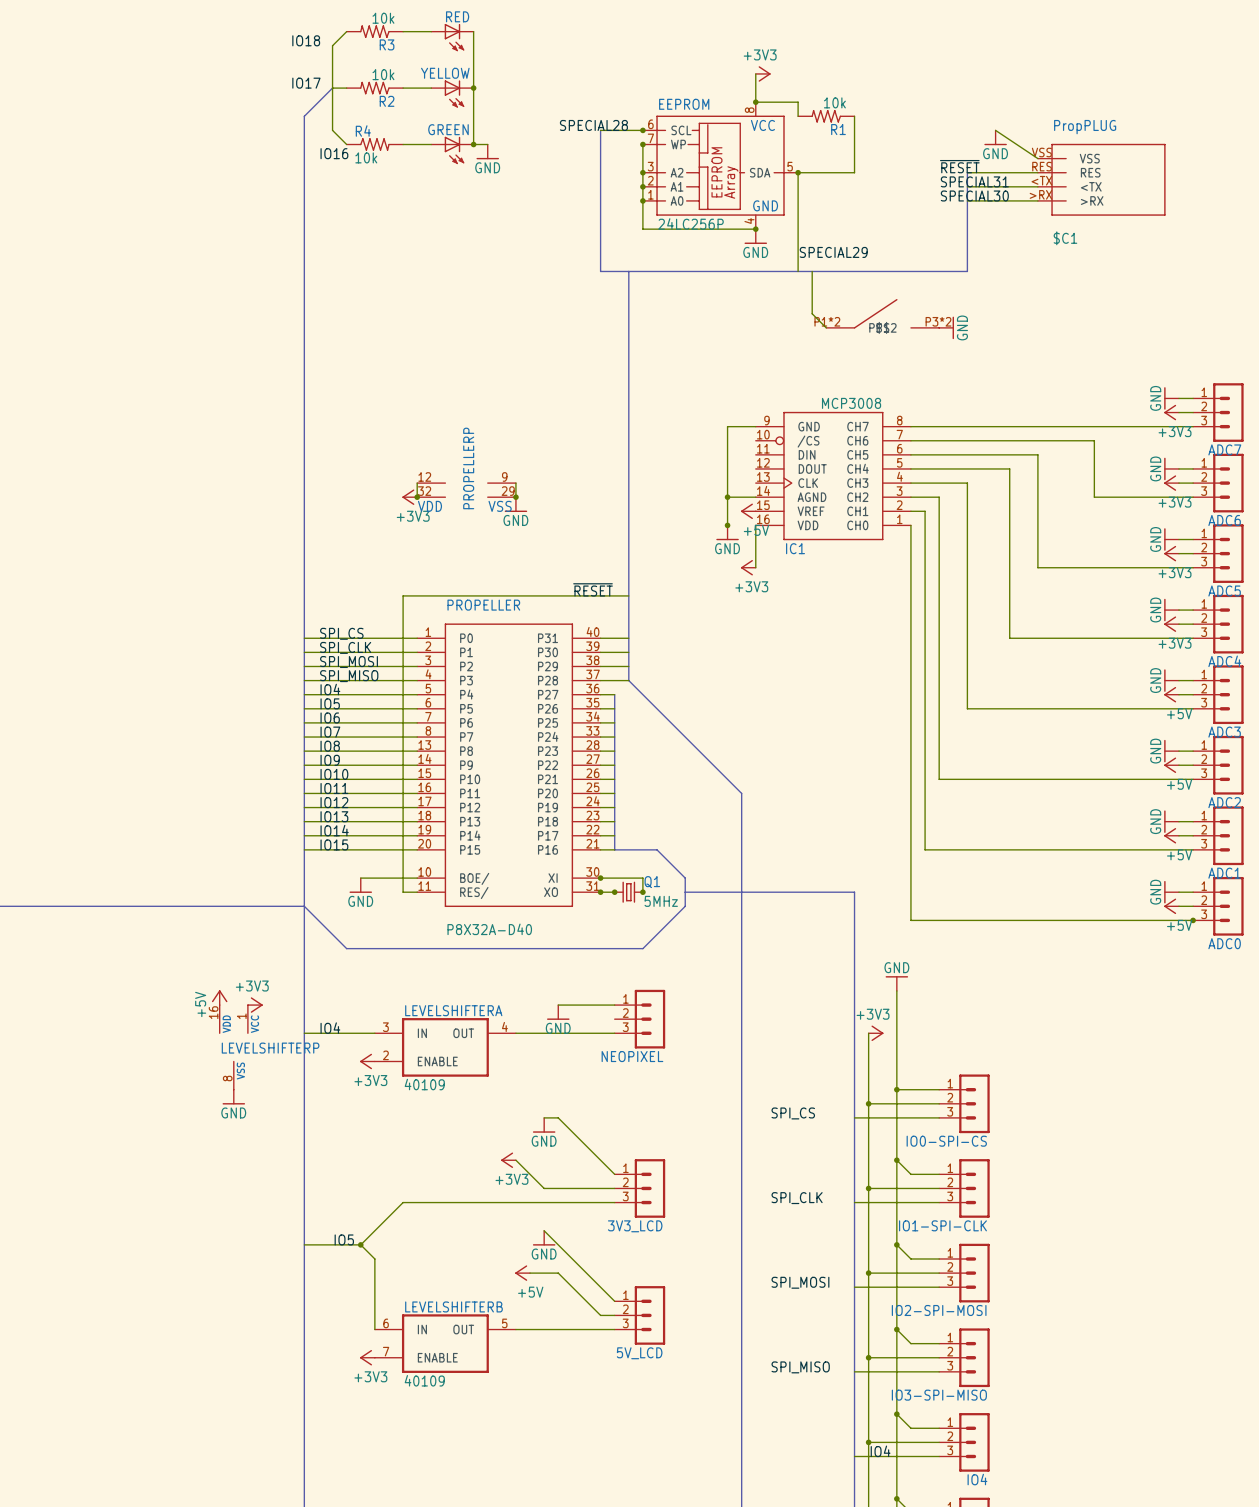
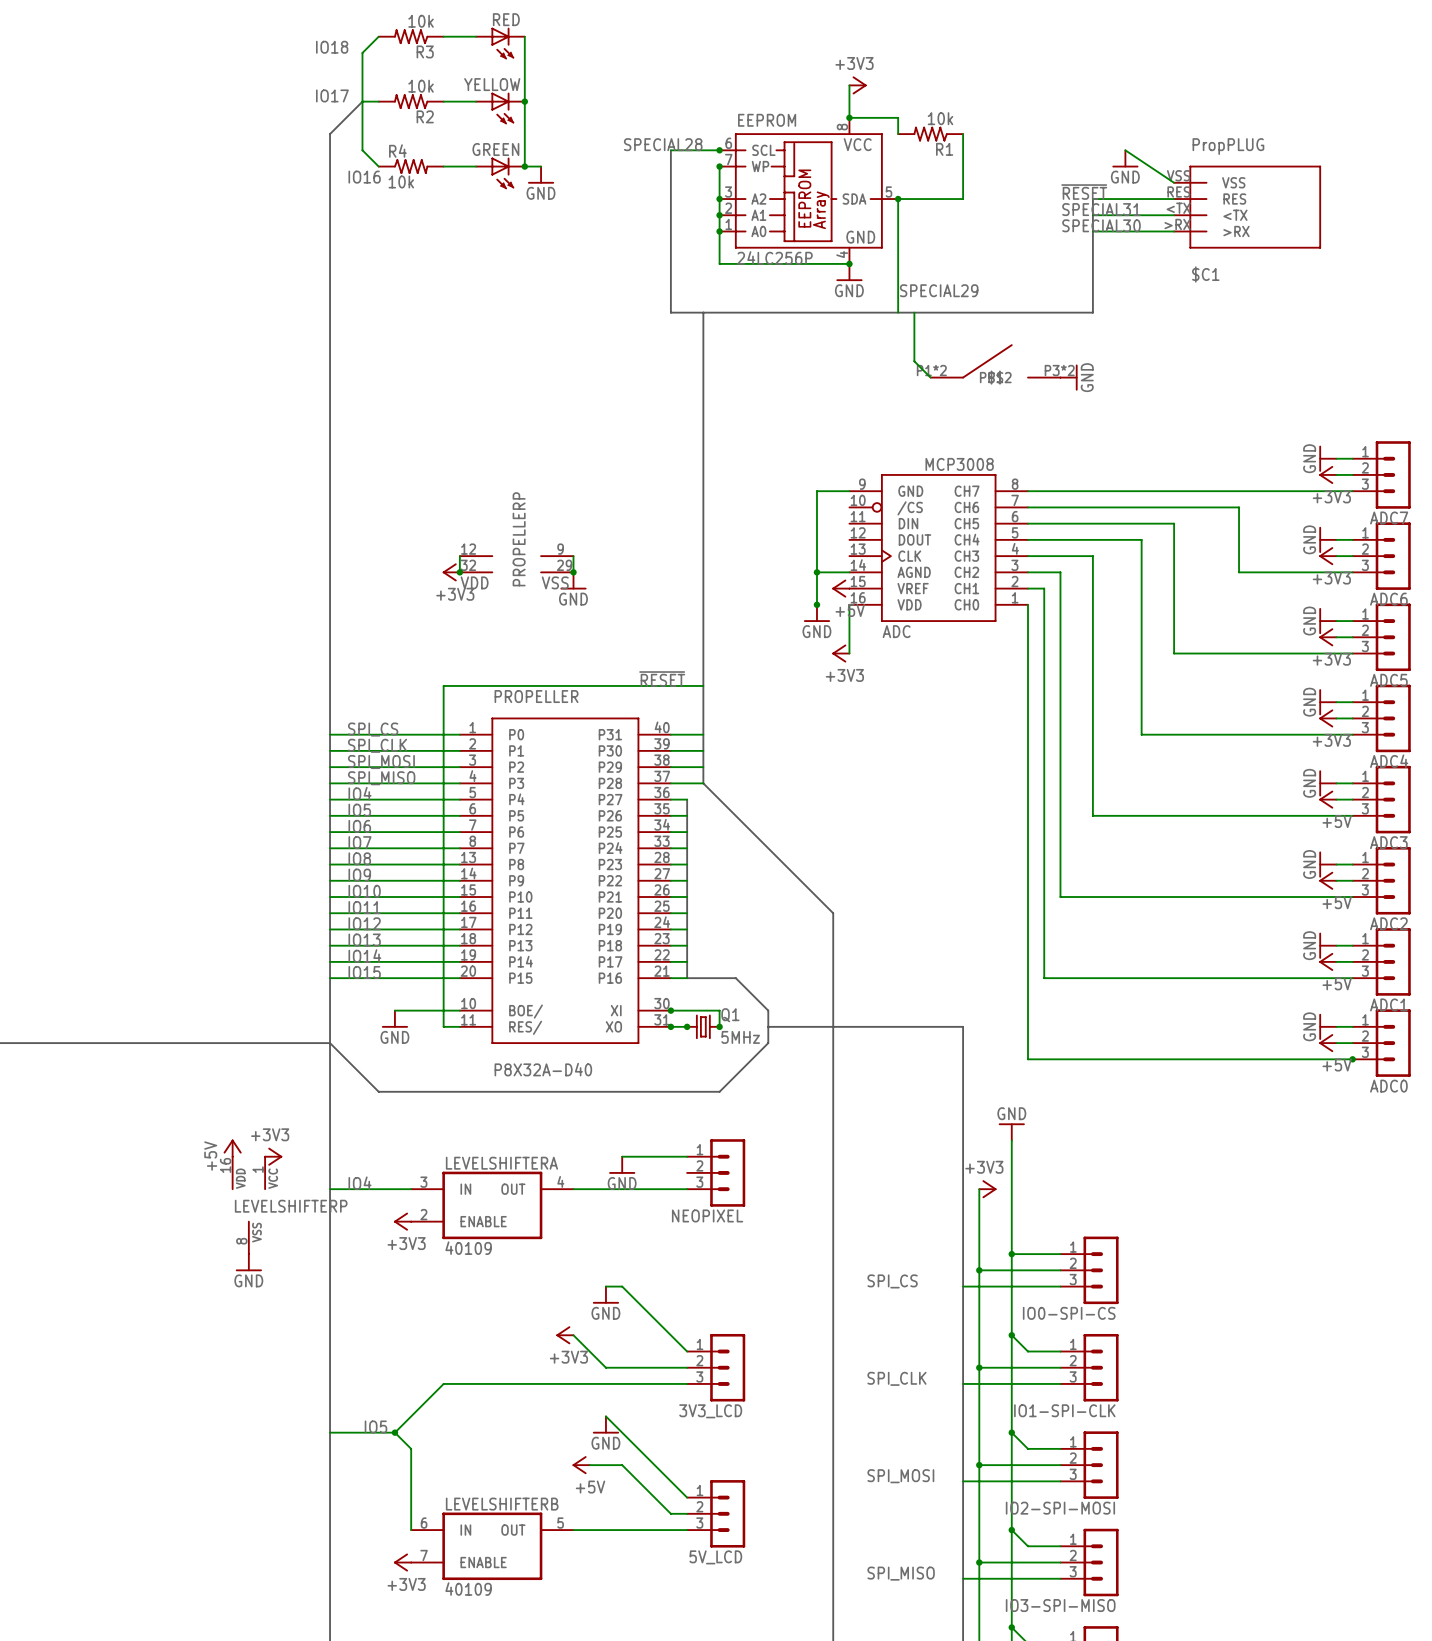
IC1 name: IC1 (795, 548) -> ADC (896, 631)

